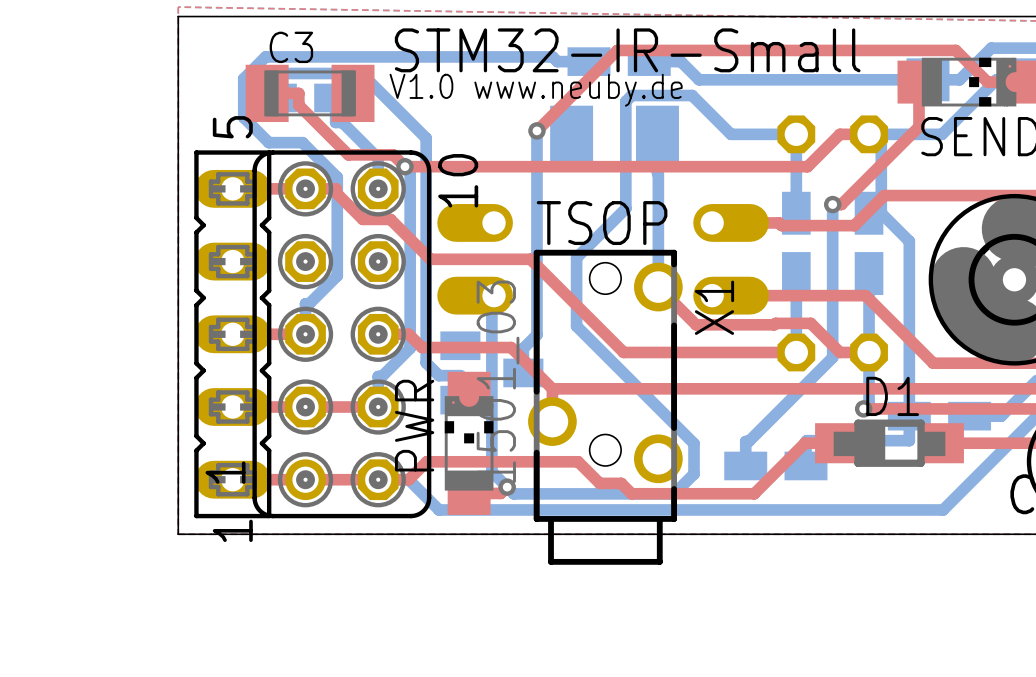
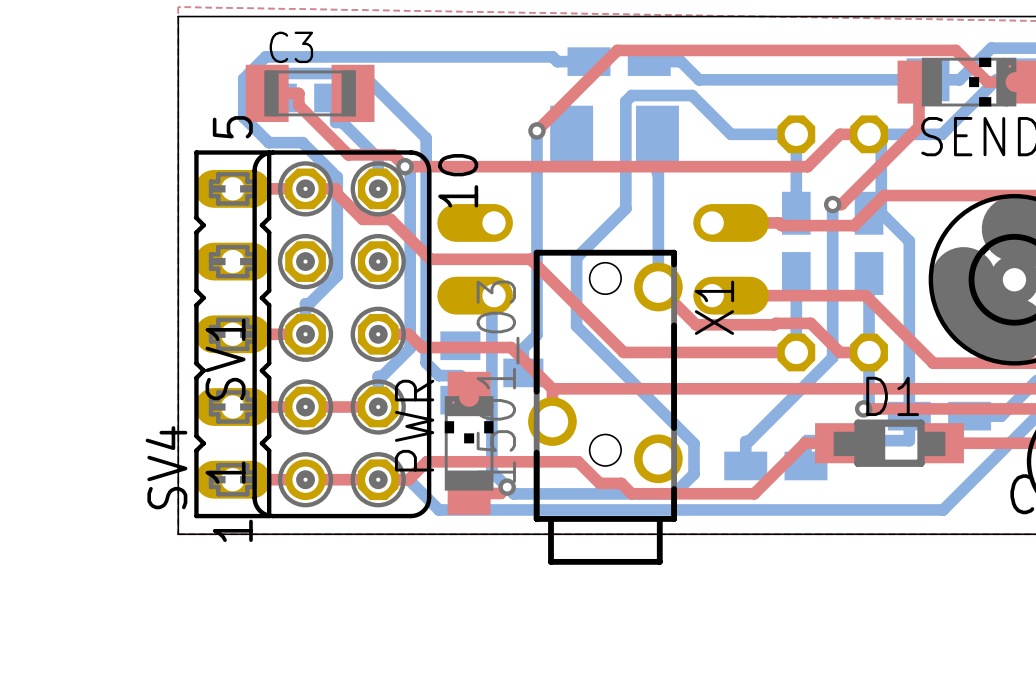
text: STM32-IR-Small (627, 50) -> none
text: V1.0 www.neuby.de (536, 90) -> none
text: TSOP (602, 223) -> none
SV1 name: none -> SV1 (225, 359)
SV4 name: none -> SV4 (166, 467)

